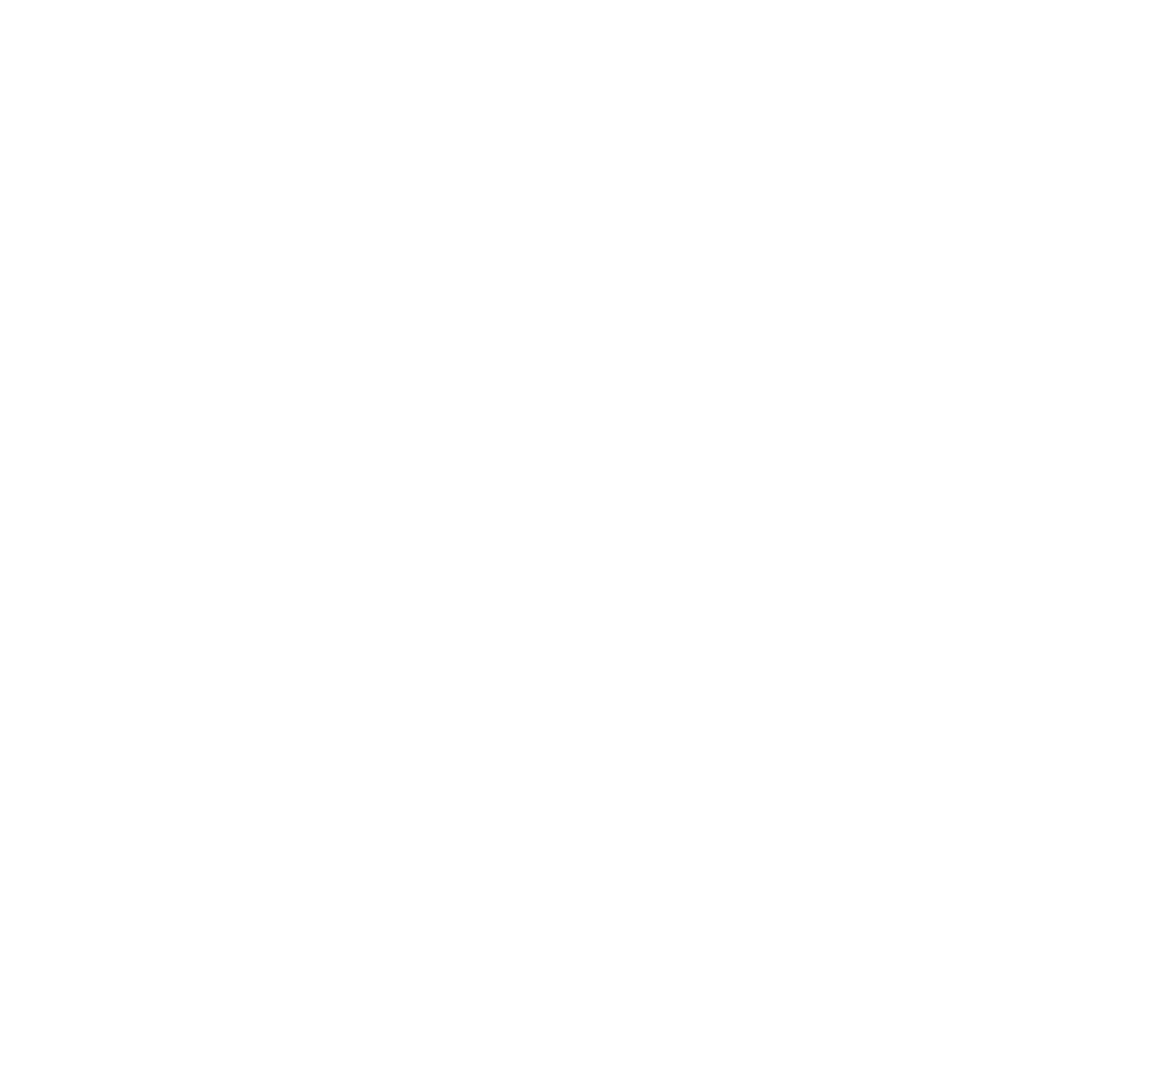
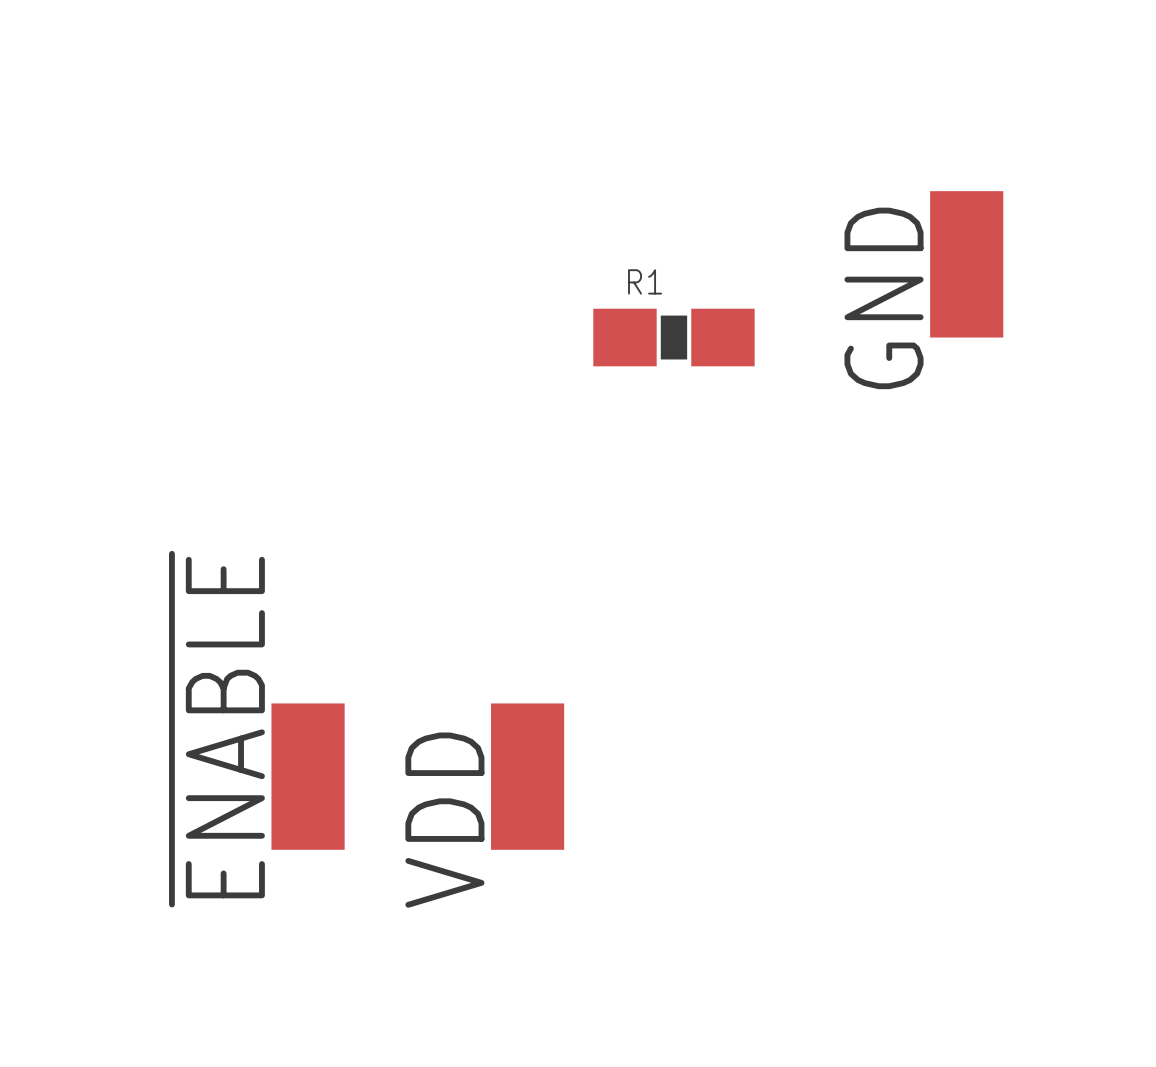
GND: none -> (966, 264)
R1: none -> (673, 337)
~{ENABLE}: none -> (308, 776)
VDD: none -> (527, 776)

